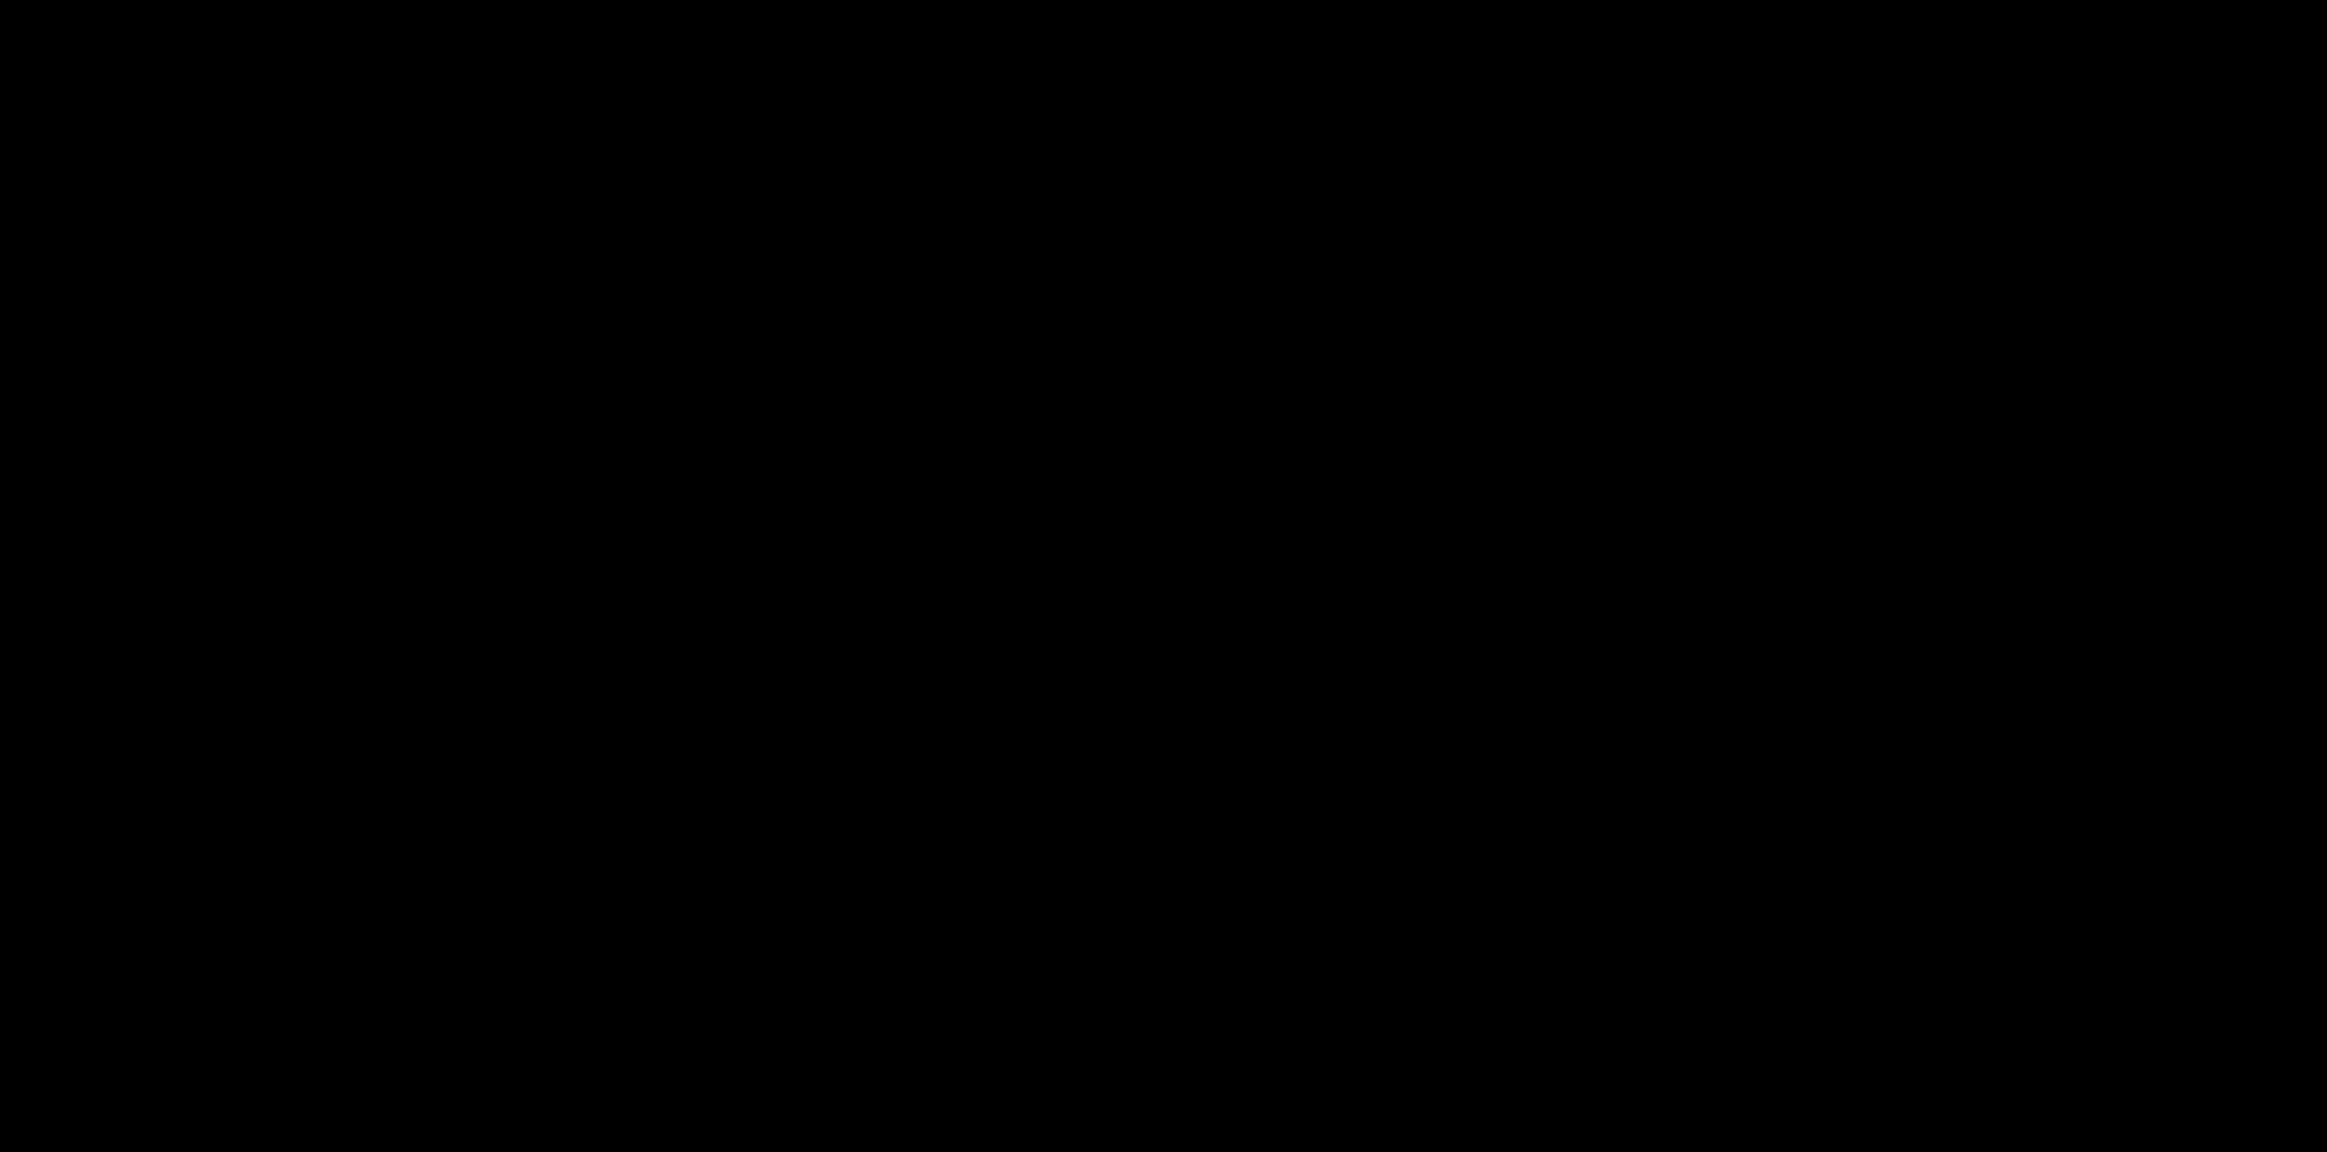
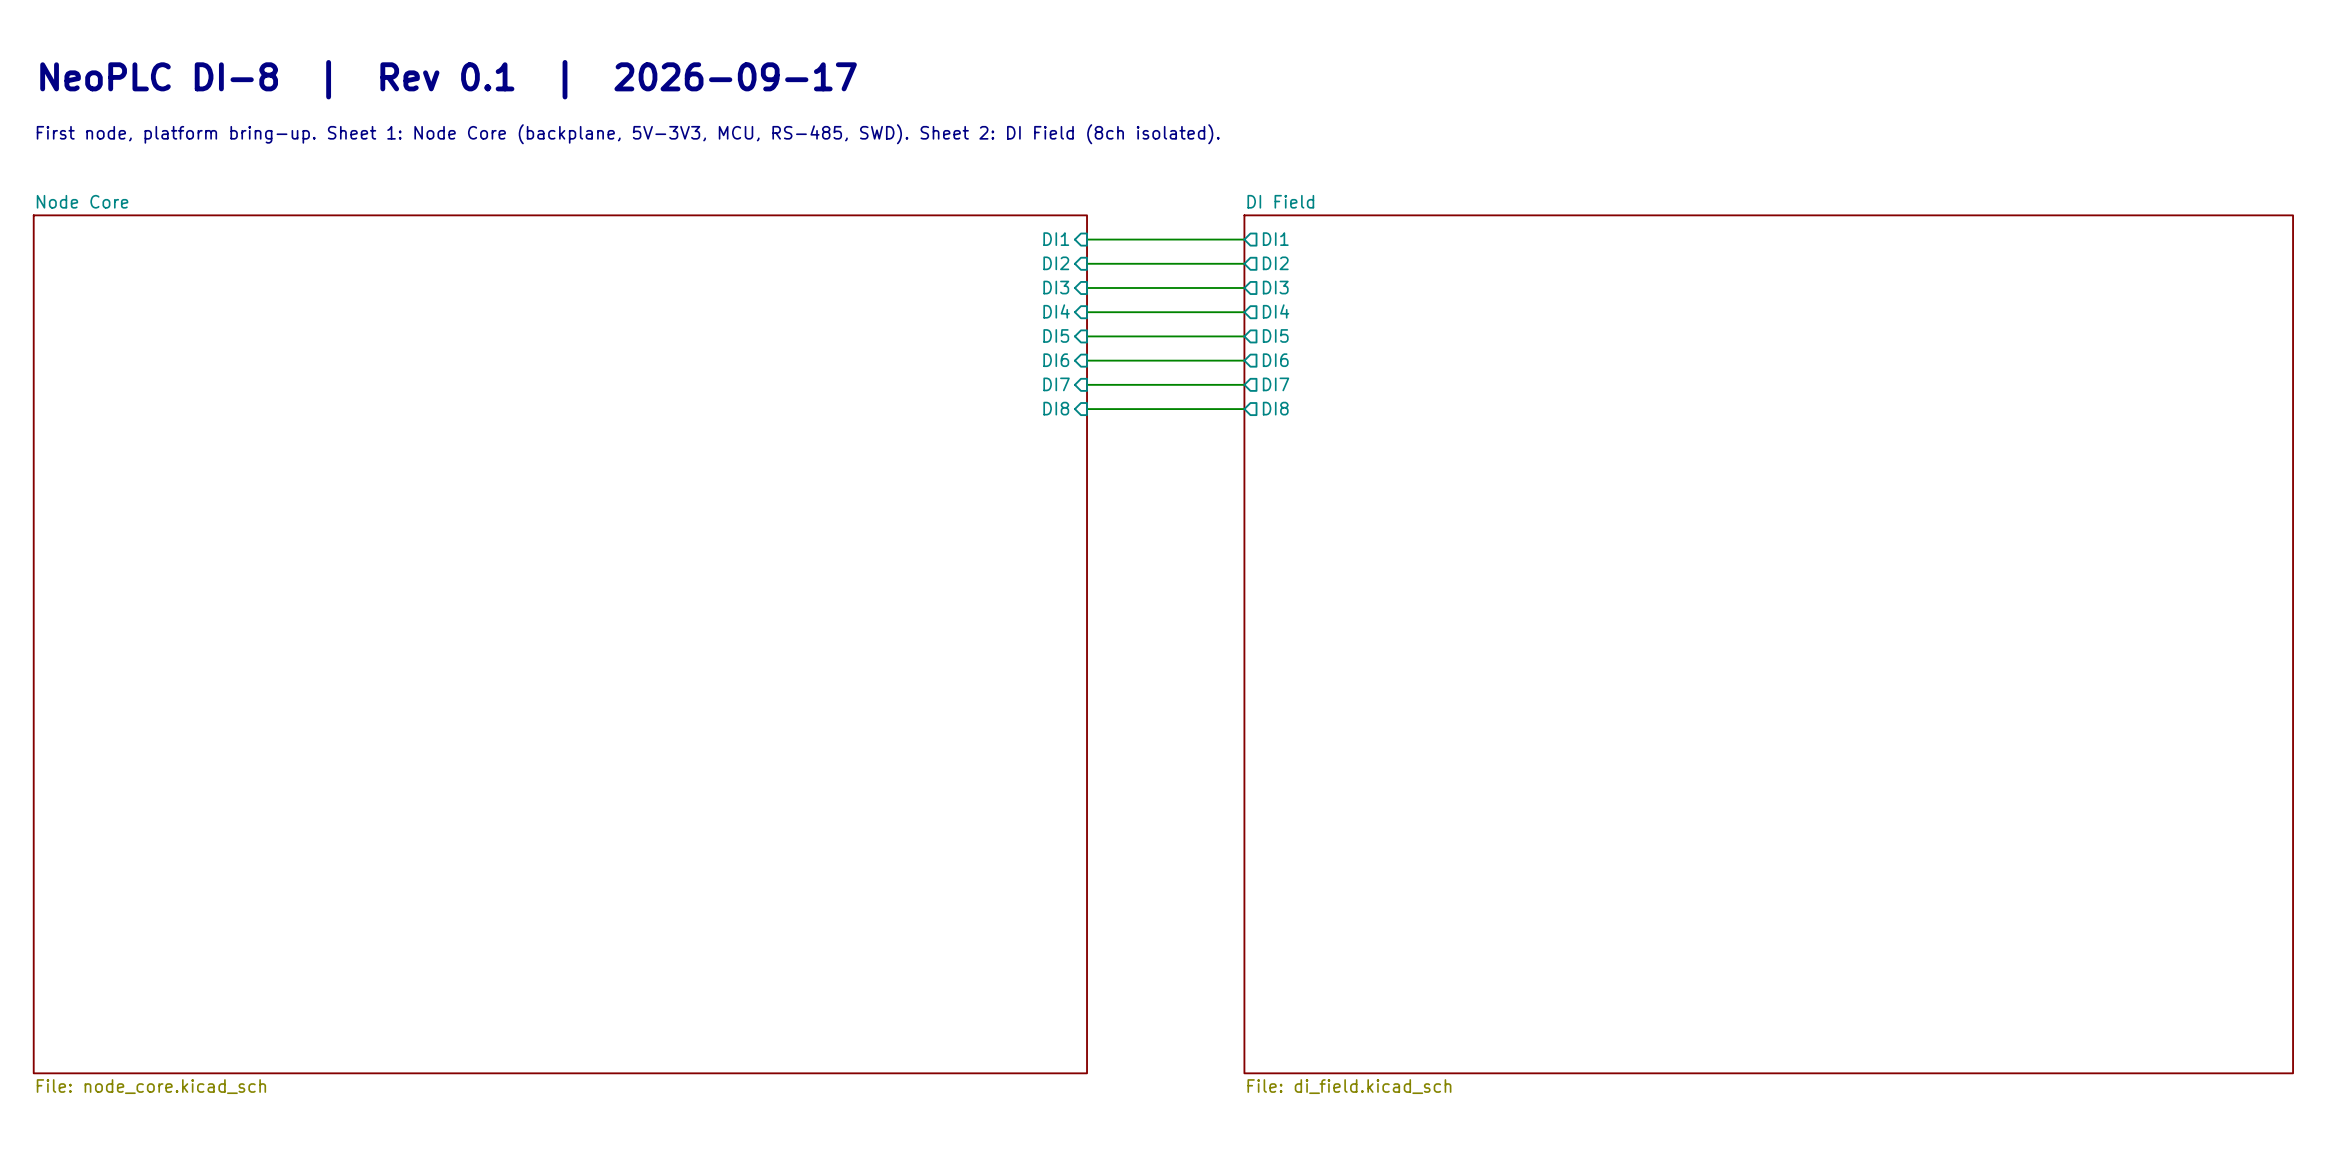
text: none -> NeoPLC DI-8 | Rev 0.1 | 2026-09-17 (448, 79)
text: none -> First node, platform bring-up. Sheet 1: Node Core (backplane, 5V-3V3, MCU, RS-485, SWD). Sheet 2: DI Field (8ch isolated). (628, 134)
sheet pin: none -> DI1 (1056, 239)
wire: none -> (1087, 239) (1244, 239)
sheet pin: none -> DI1 (1275, 239)
sheet pin: none -> DI2 (1056, 263)
wire: none -> (1087, 263) (1244, 263)
sheet pin: none -> DI2 (1275, 263)
sheet pin: none -> DI3 (1056, 287)
wire: none -> (1087, 287) (1244, 287)
sheet pin: none -> DI3 (1275, 287)
sheet pin: none -> DI4 (1056, 311)
sheet pin: none -> DI4 (1276, 311)
wire: none -> (1087, 312) (1244, 312)
sheet pin: none -> DI5 (1056, 335)
sheet pin: none -> DI5 (1275, 335)
wire: none -> (1087, 336) (1244, 336)
sheet pin: none -> DI6 (1056, 360)
wire: none -> (1087, 360) (1244, 360)
sheet pin: none -> DI6 (1275, 360)
sheet pin: none -> DI7 (1056, 384)
wire: none -> (1087, 384) (1244, 384)
sheet pin: none -> DI7 (1276, 384)
sheet pin: none -> DI8 (1056, 408)
sheet pin: none -> DI8 (1275, 408)
wire: none -> (1087, 409) (1244, 409)
sheet Node Core: none -> File: node_core.kicad_sch (560, 644)
sheet DI Field: none -> File: di_field.kicad_sch (1768, 644)

